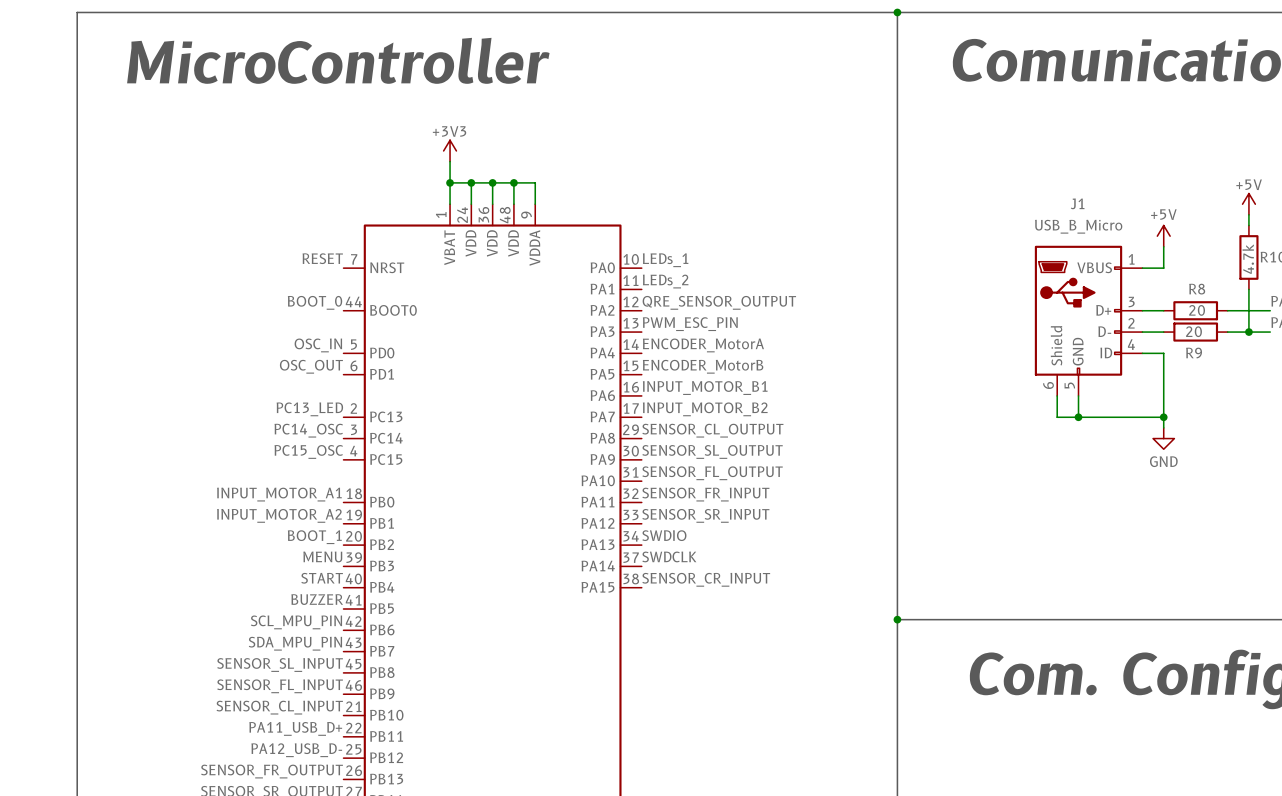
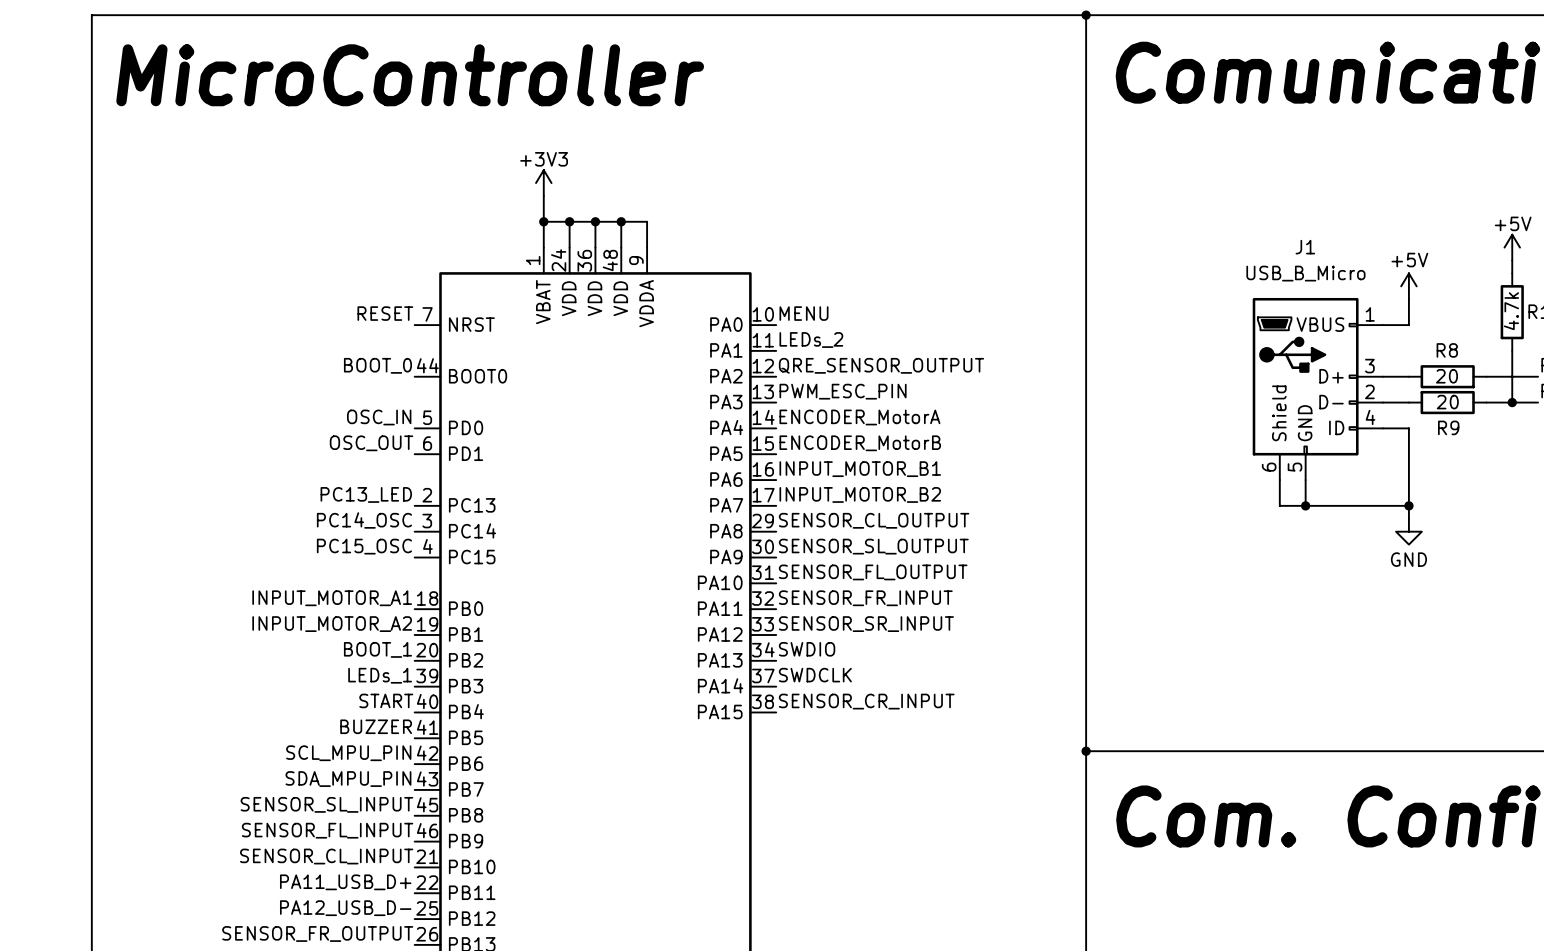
label: LEDs_1 (665, 260) -> MENU (803, 313)
label: MENU (322, 556) -> LEDs_1 (380, 675)

